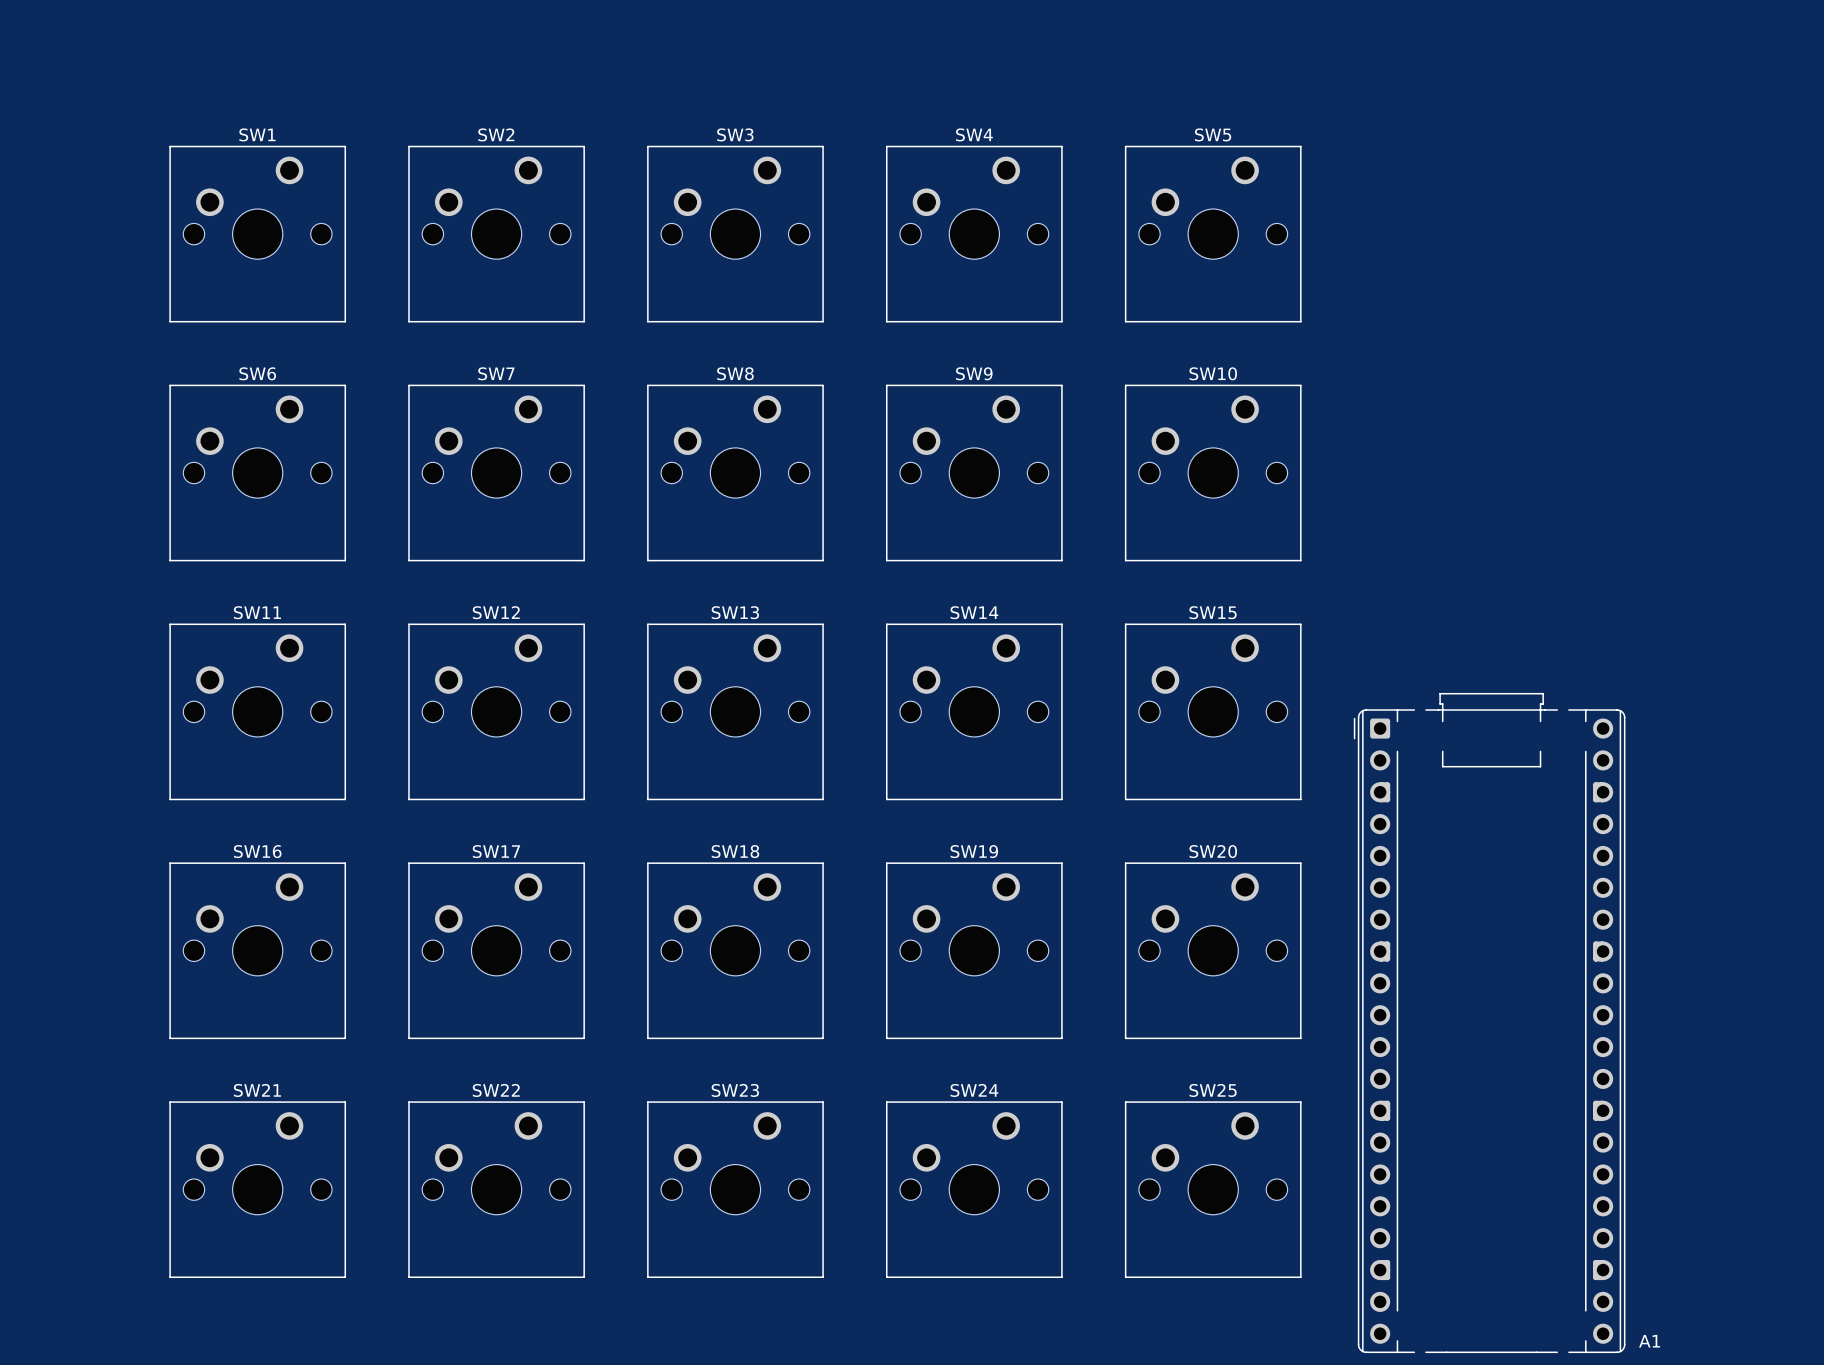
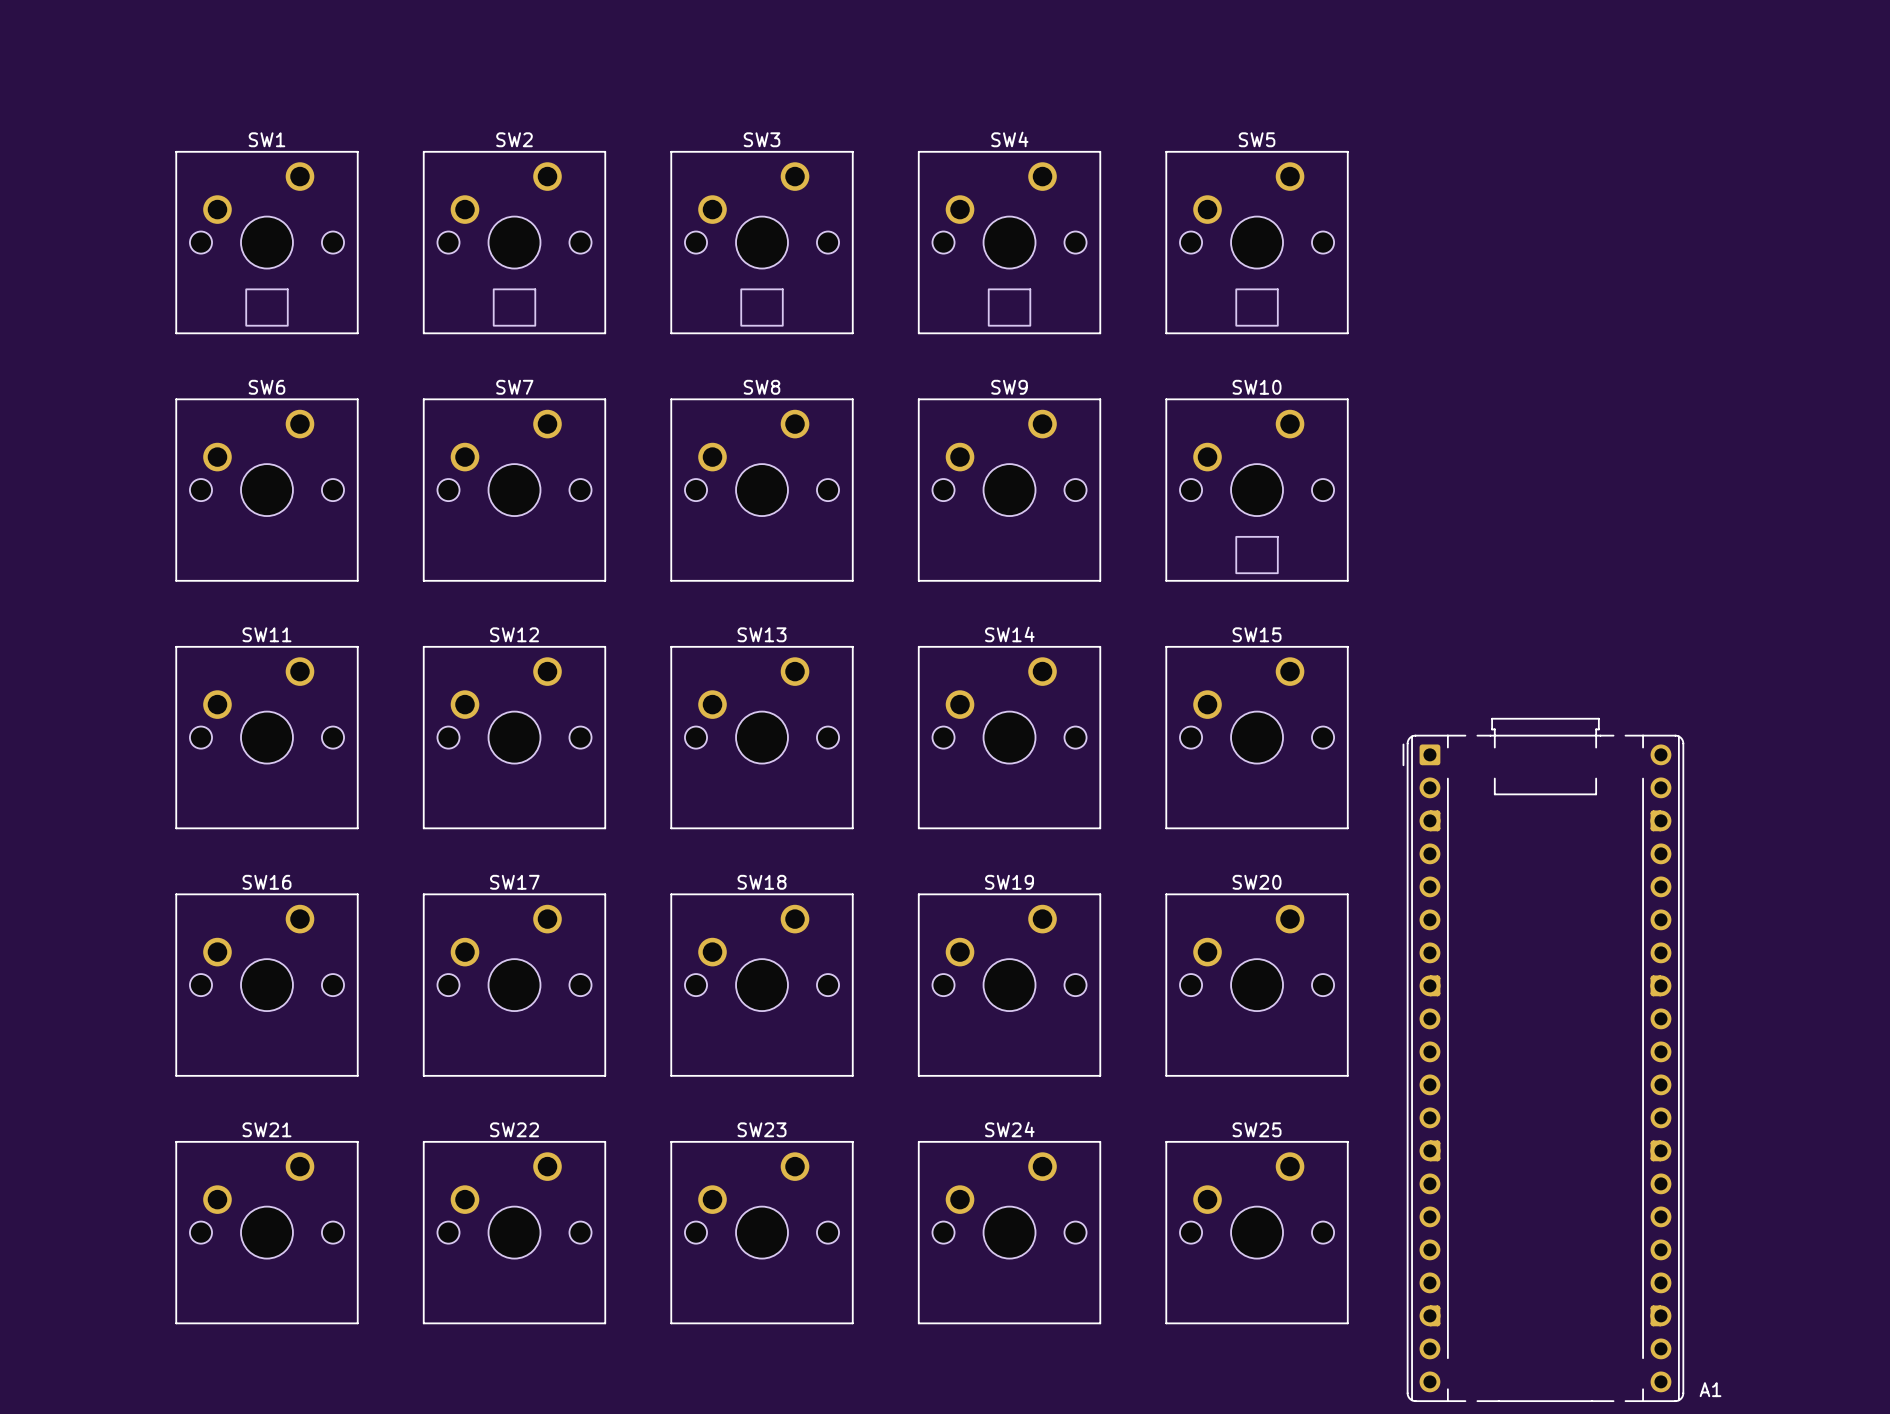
part: none -> (266, 307)
part: none -> (514, 307)
part: none -> (762, 307)
part: none -> (1009, 307)
part: none -> (1257, 307)
part: none -> (1257, 555)

